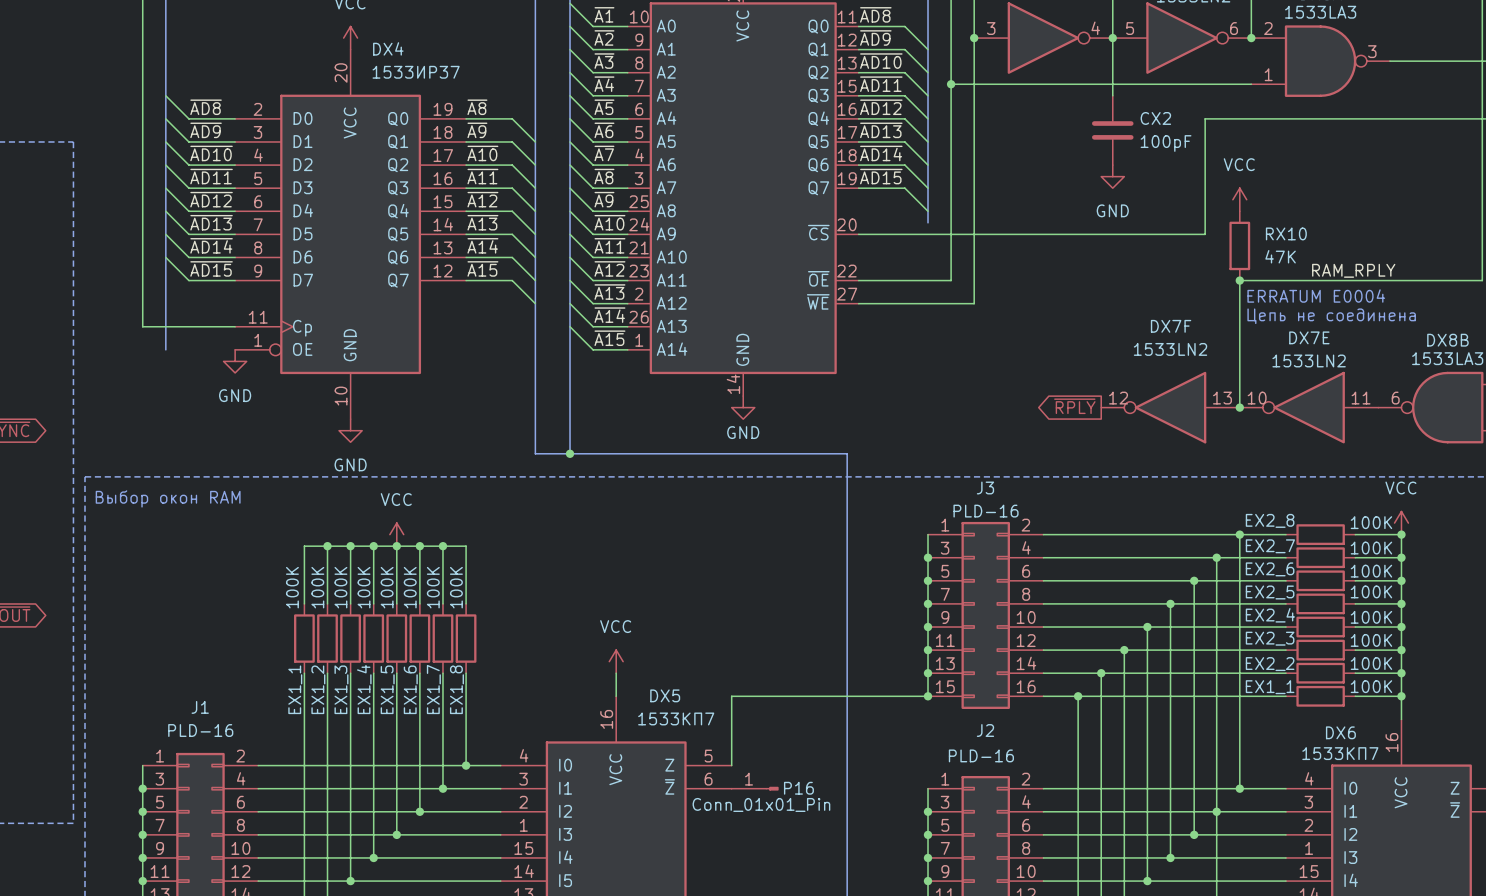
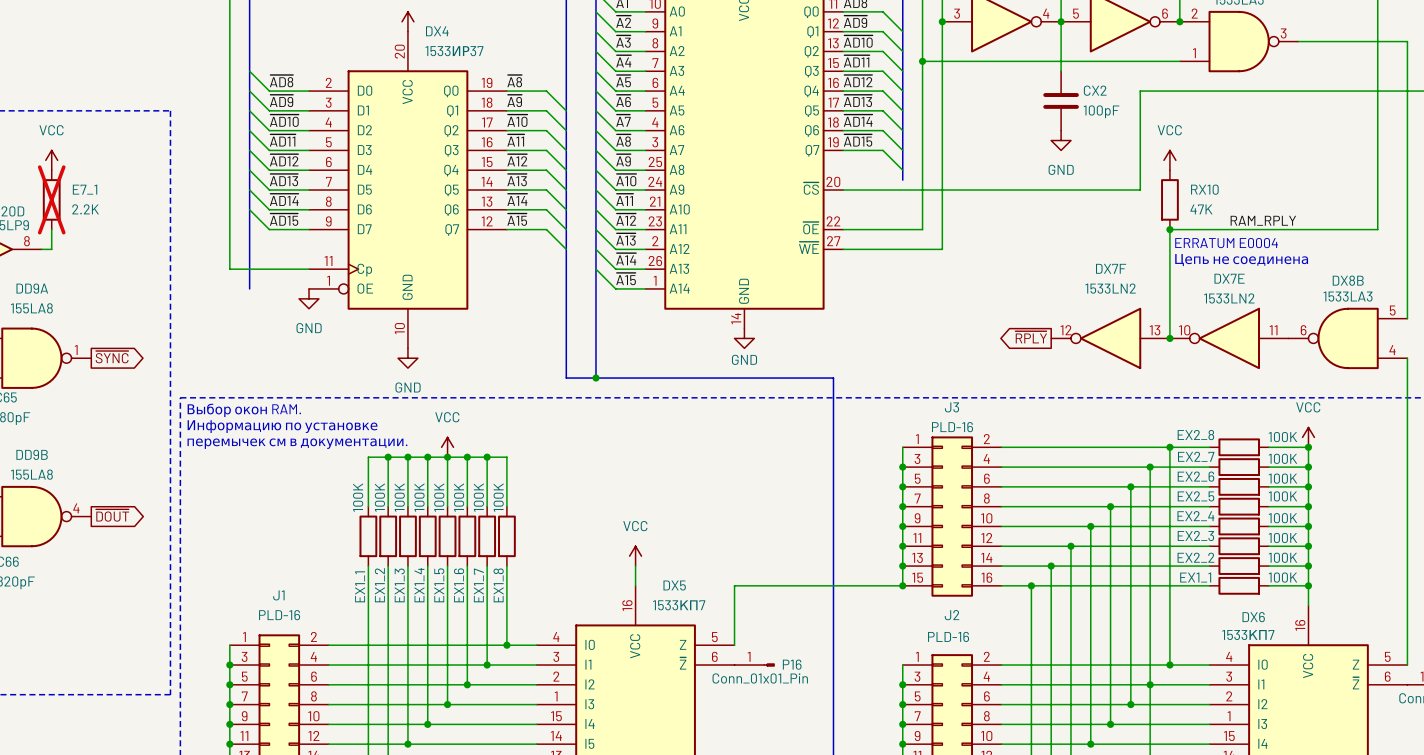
text: Выбор окон RAM (168, 498) -> Выбор окон RAM. (244, 410)
text: none -> Информацию по установке (282, 426)
text: none -> перемычек см в документации. (297, 443)

